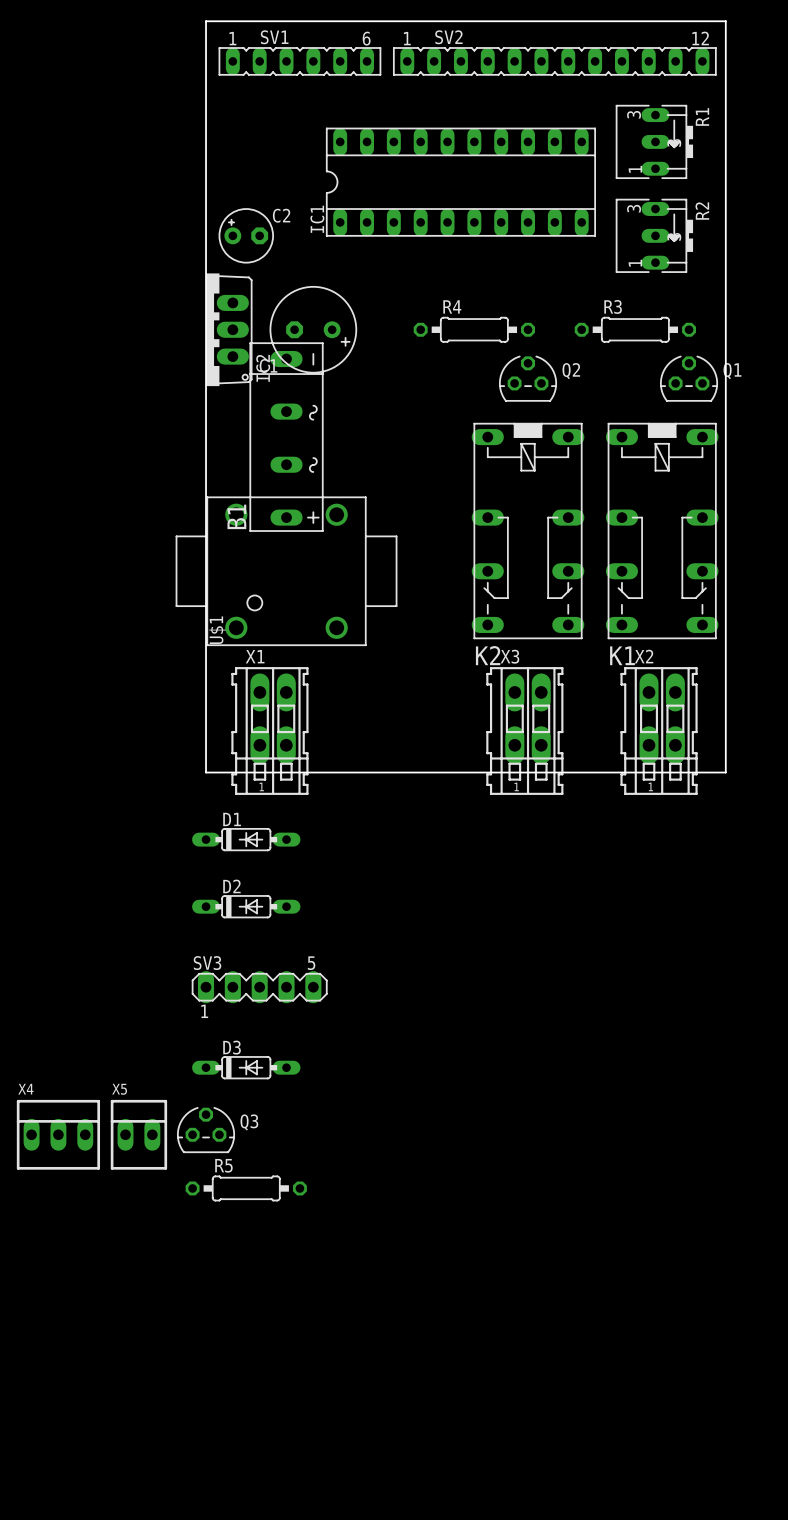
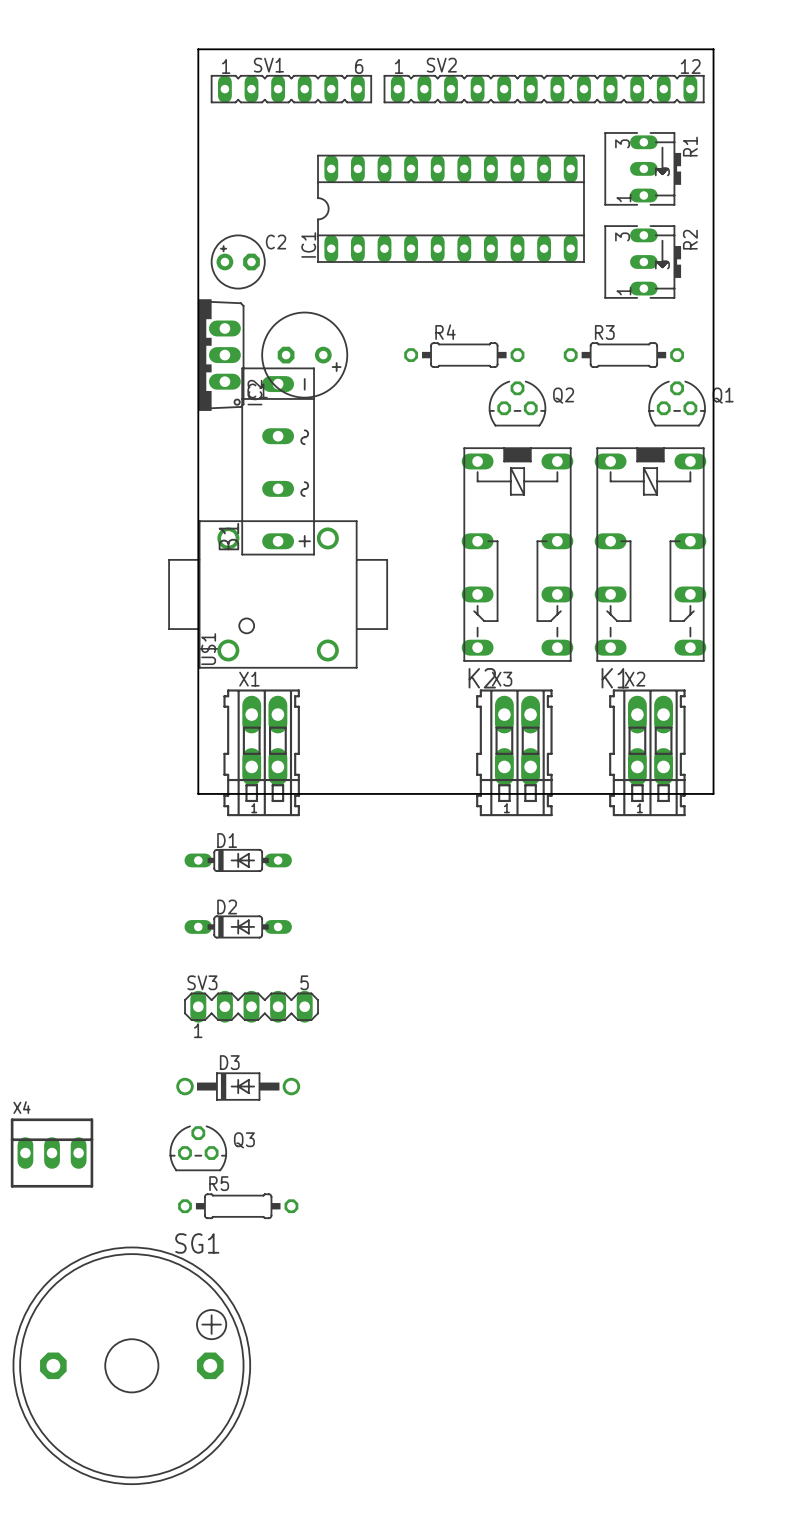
D3 footprint: [192, 1056, 301, 1080] -> [176, 1072, 301, 1101]
X5: (138, 1134) -> none
SG1: none -> (131, 1365)

